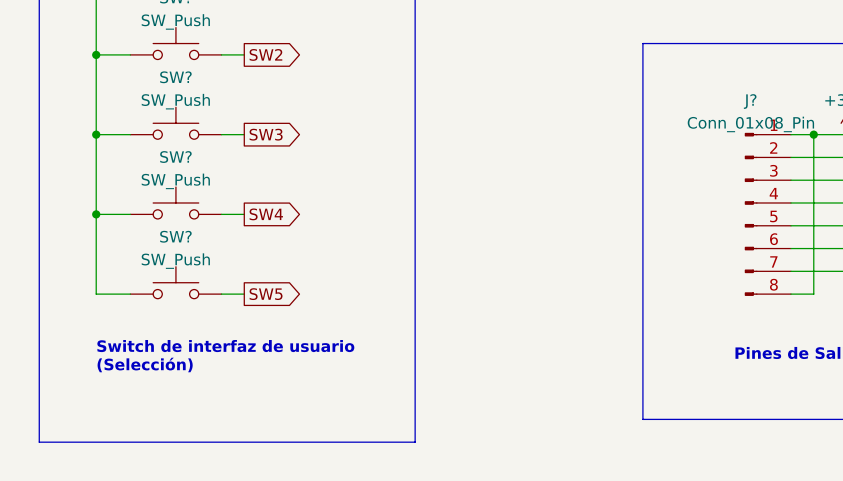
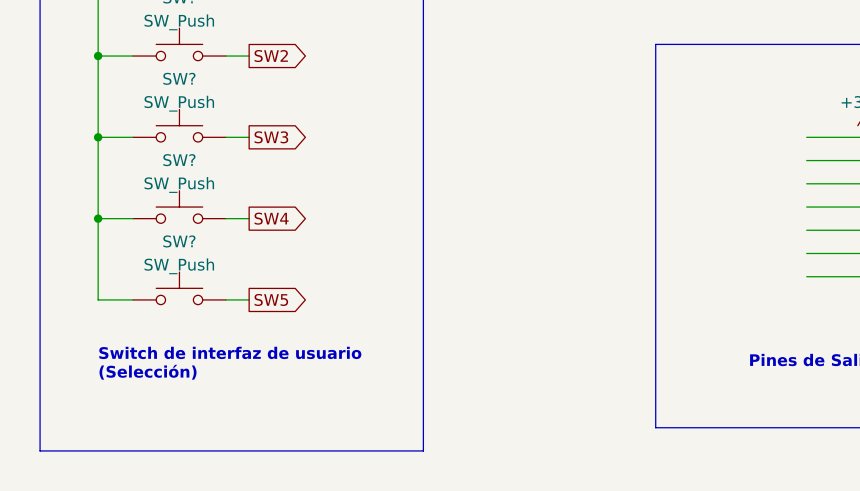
wire: (813, 134) (813, 294) (790, 294) -> none
junction: (813, 134) -> none
J?: Conn_01x08_Pin (767, 214) -> none

